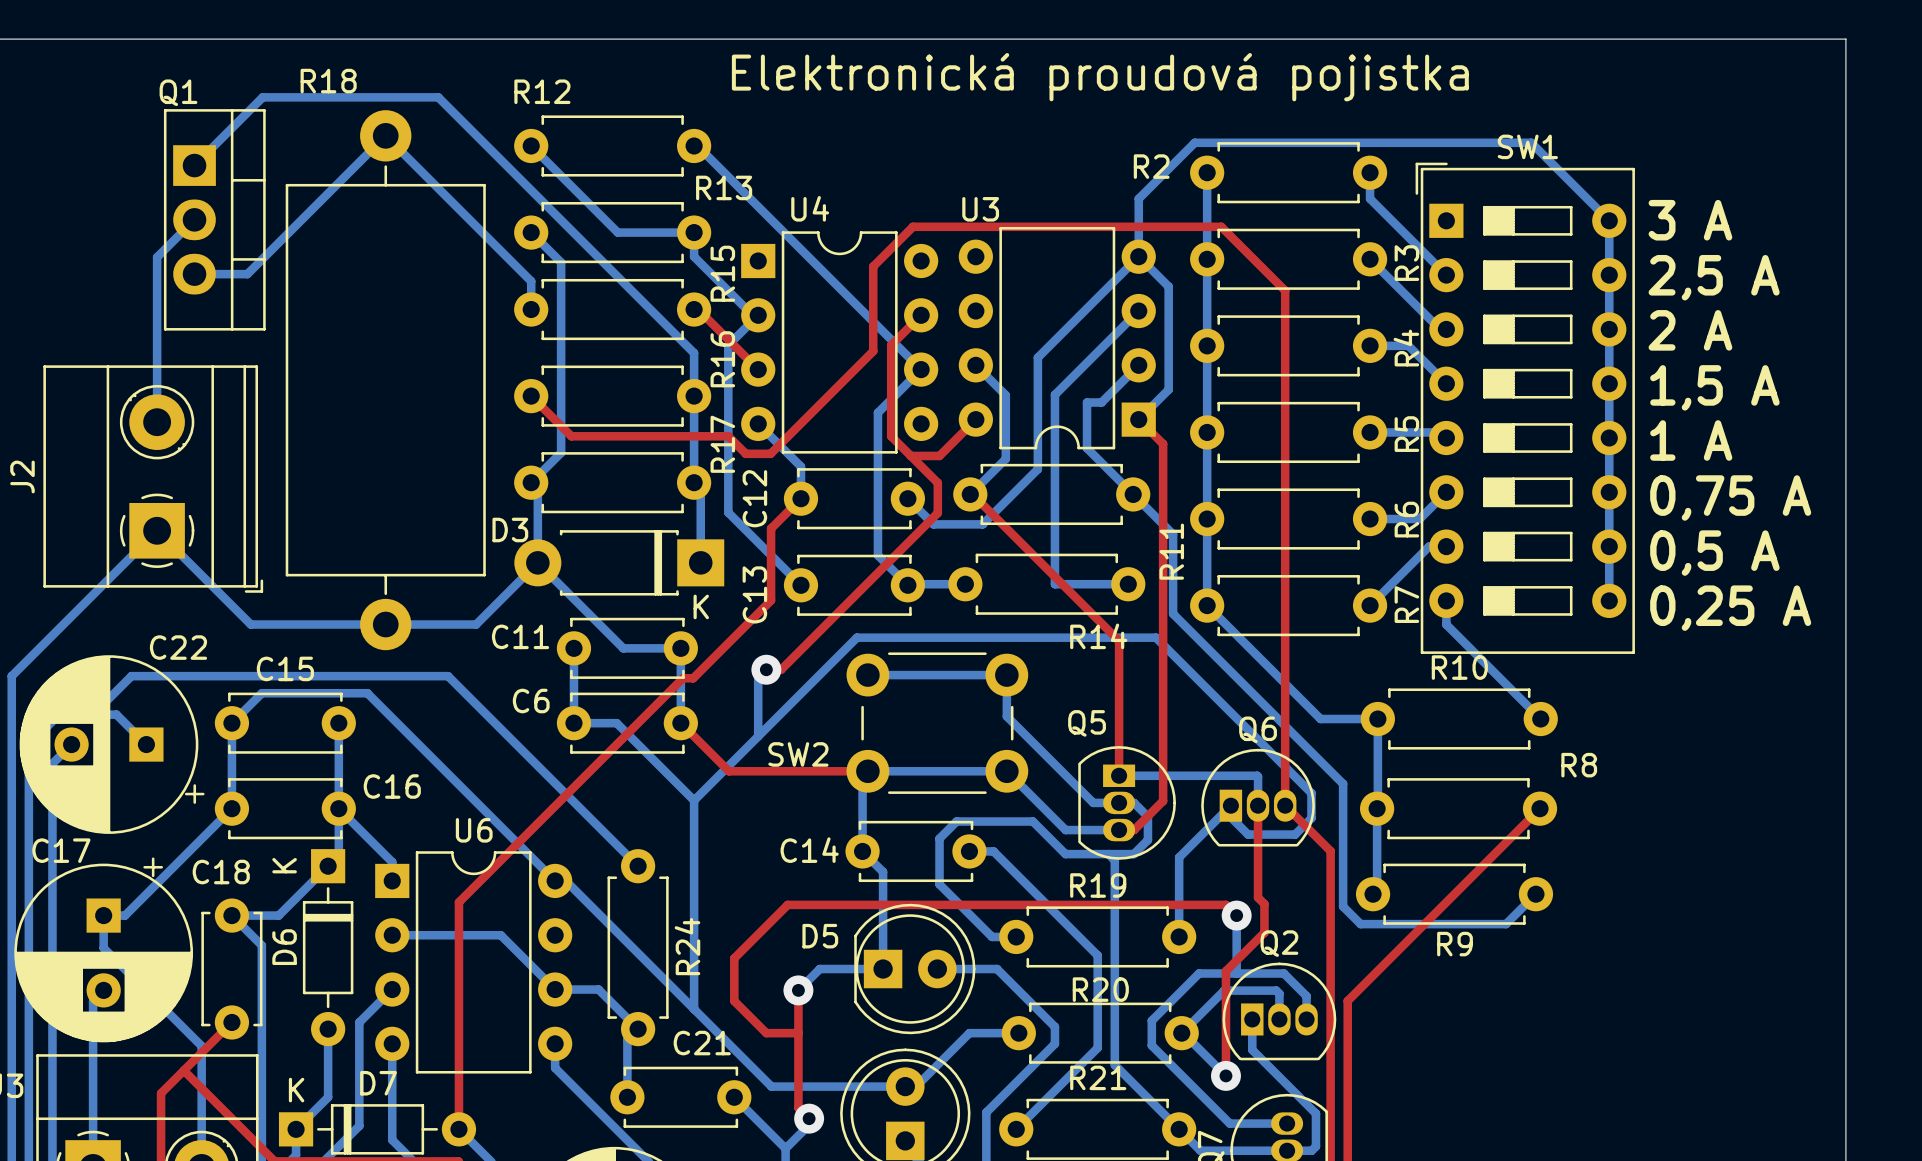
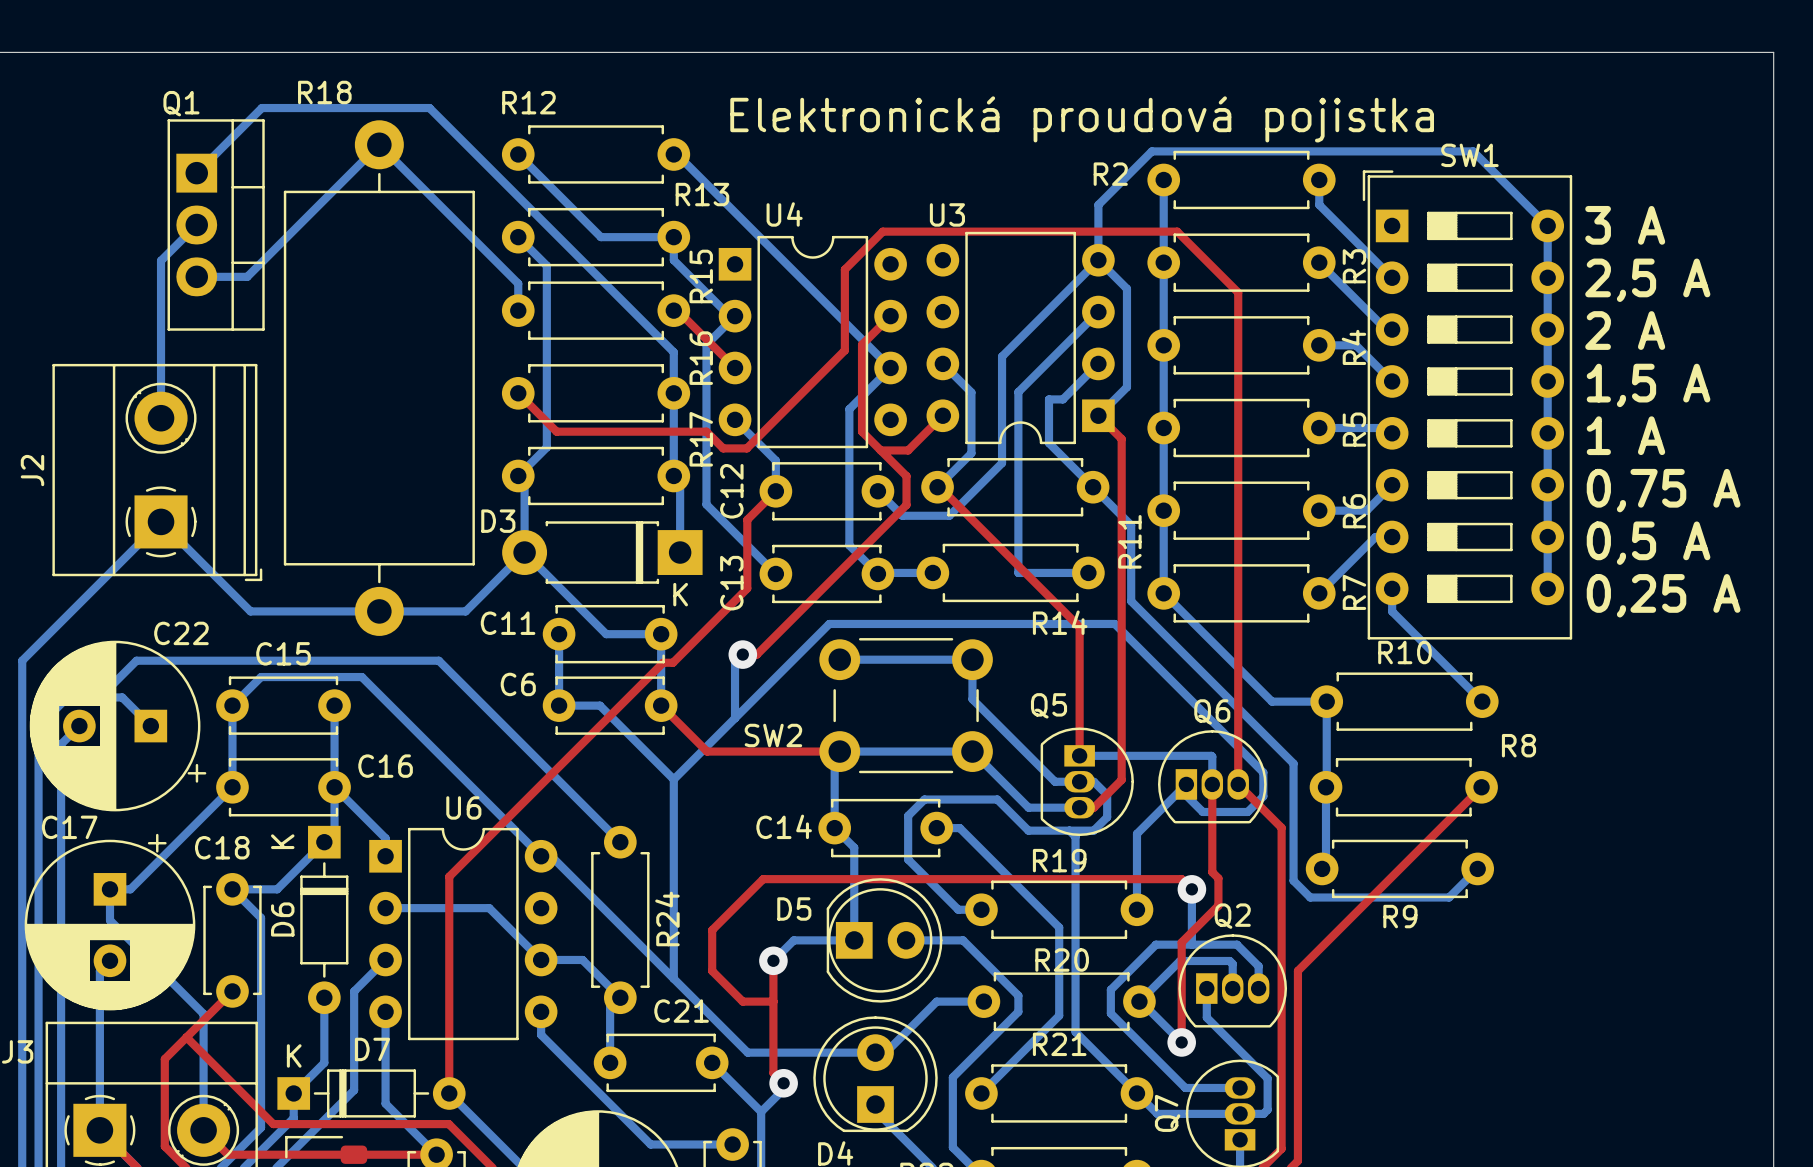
text position: Elektronická proudová pojistka (1100, 77) -> Elektronická proudová pojistka (1082, 119)

